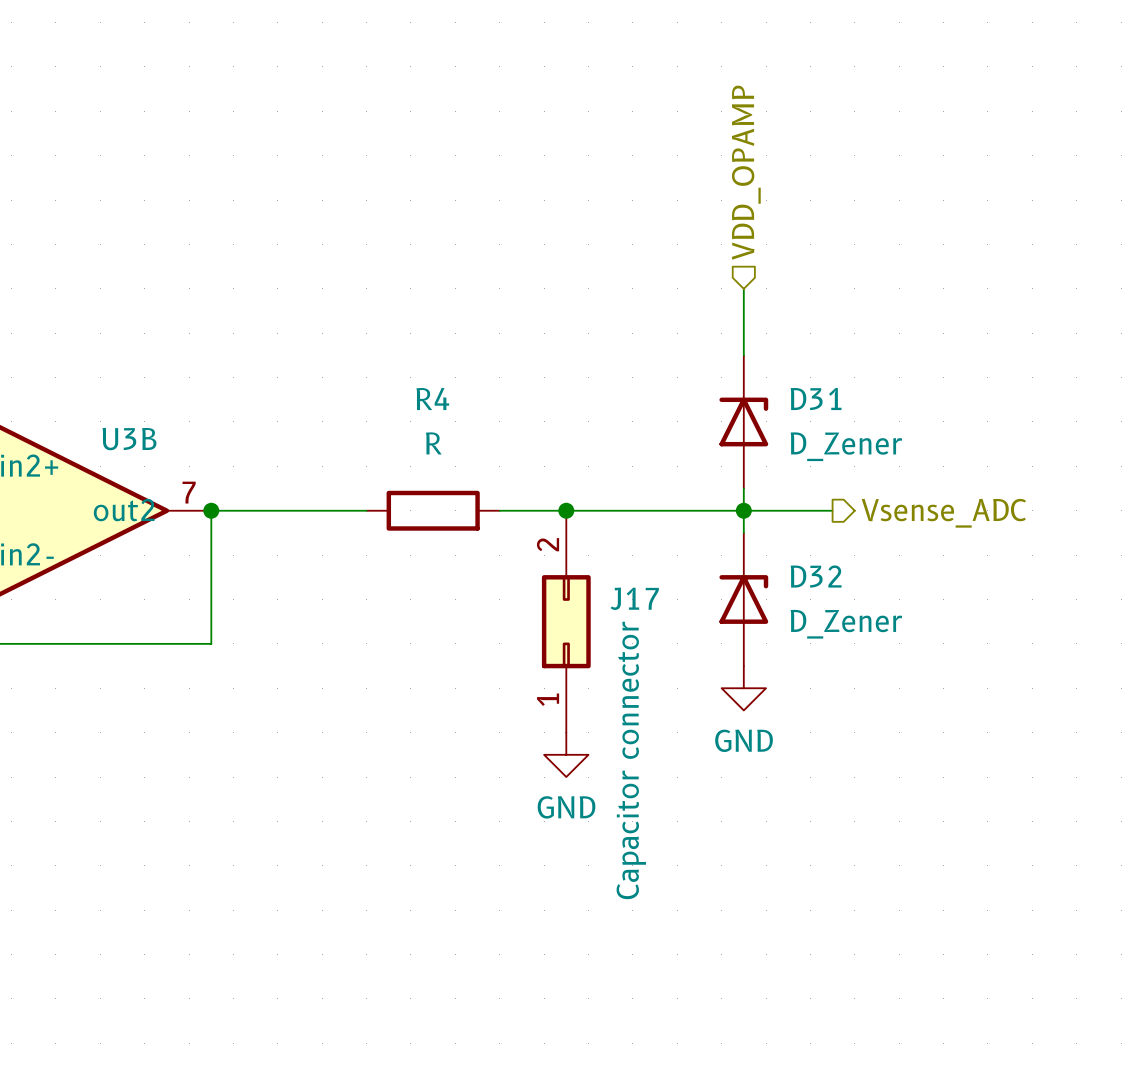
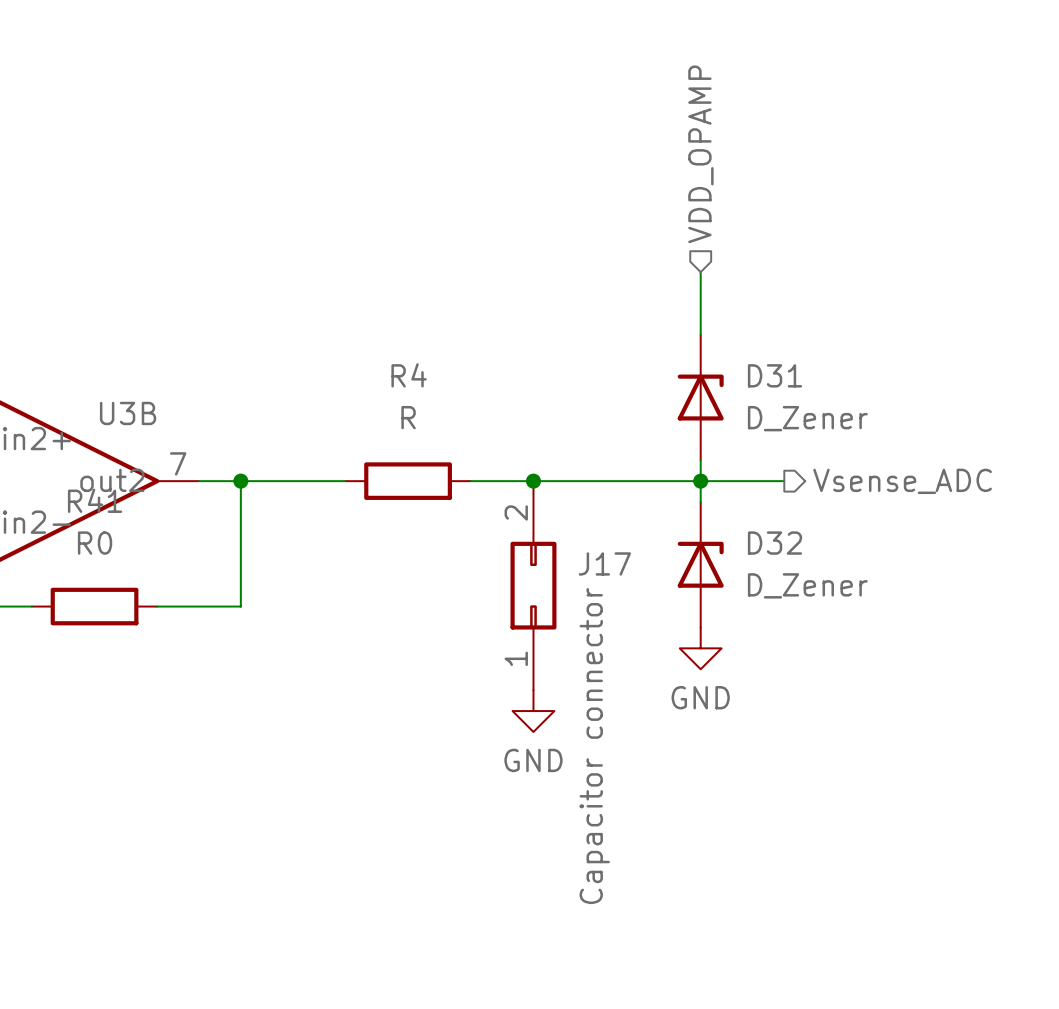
wire: (211, 510) (211, 643) -> (240, 481) (240, 606) (199, 606)
junction position: (211, 510) -> (240, 481)
wire: (33, 643) (166, 643) -> none
R41: none -> R0 (94, 606)

